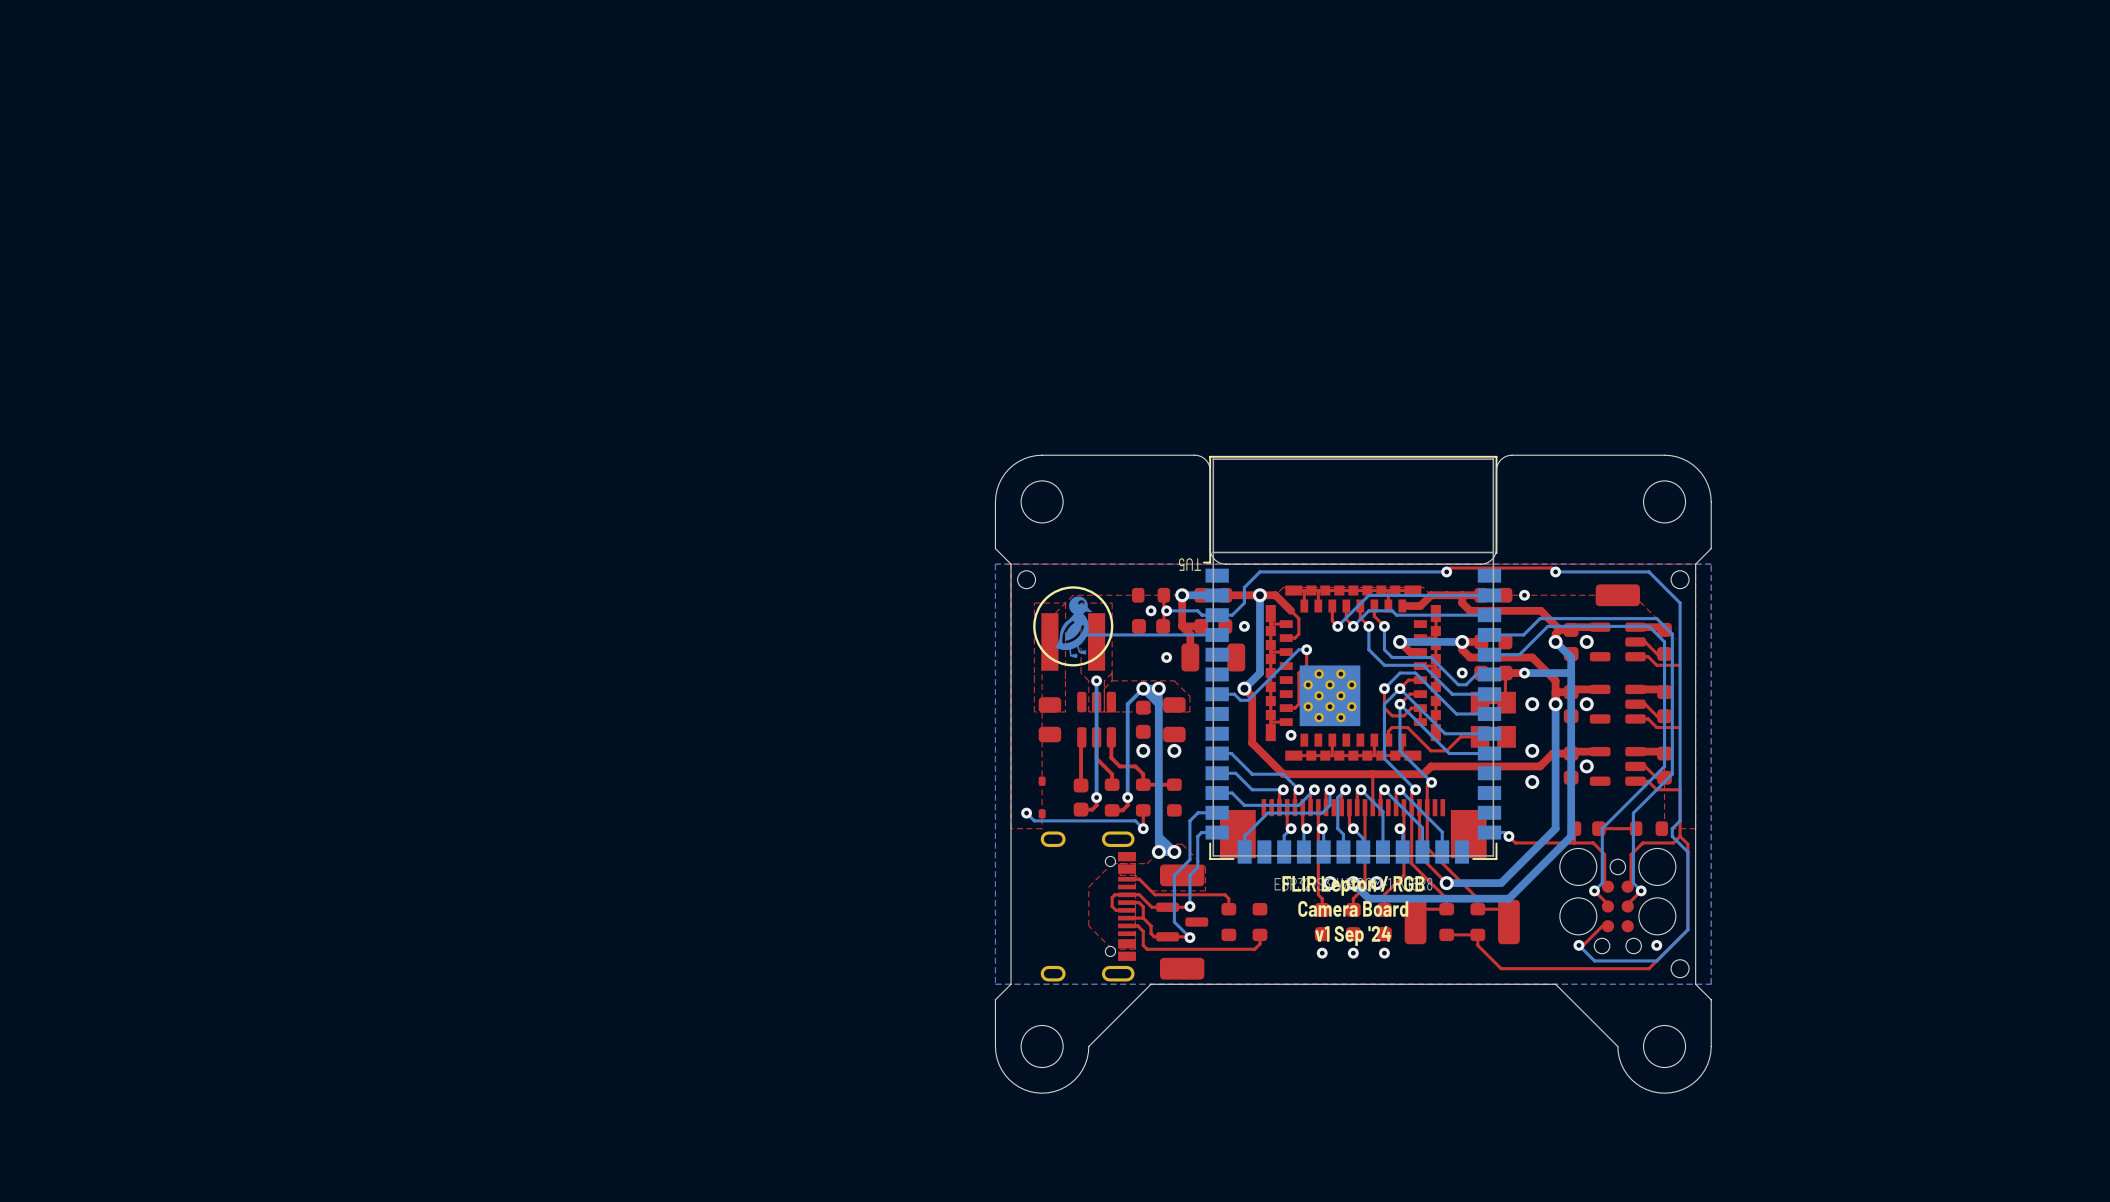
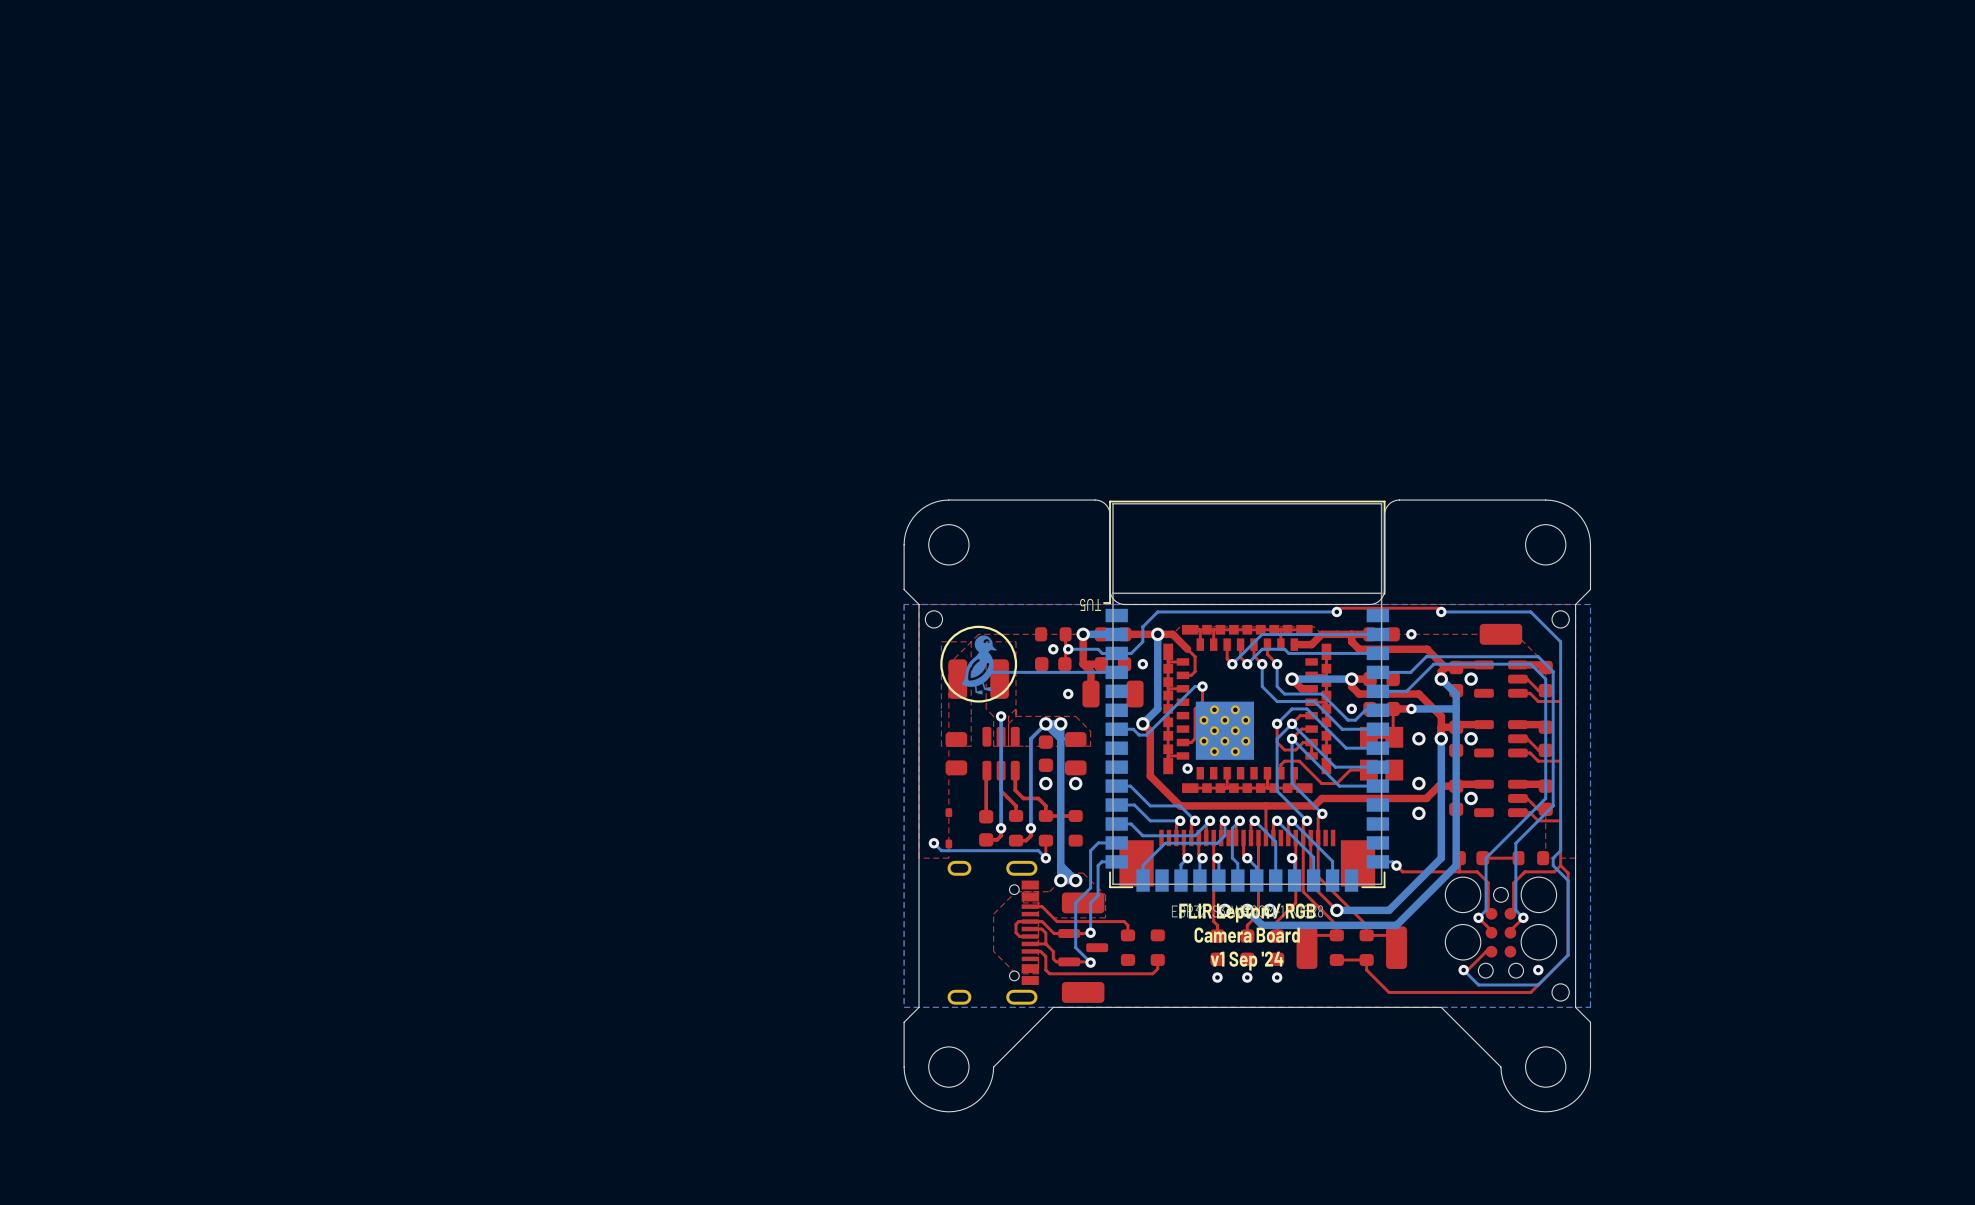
part footprint: [1041, 613, 1106, 671] -> [948, 659, 1009, 699]

